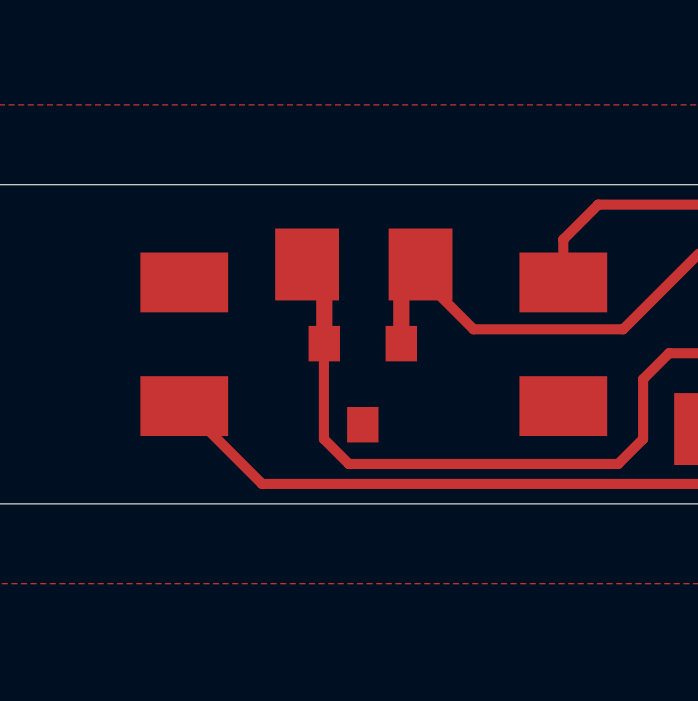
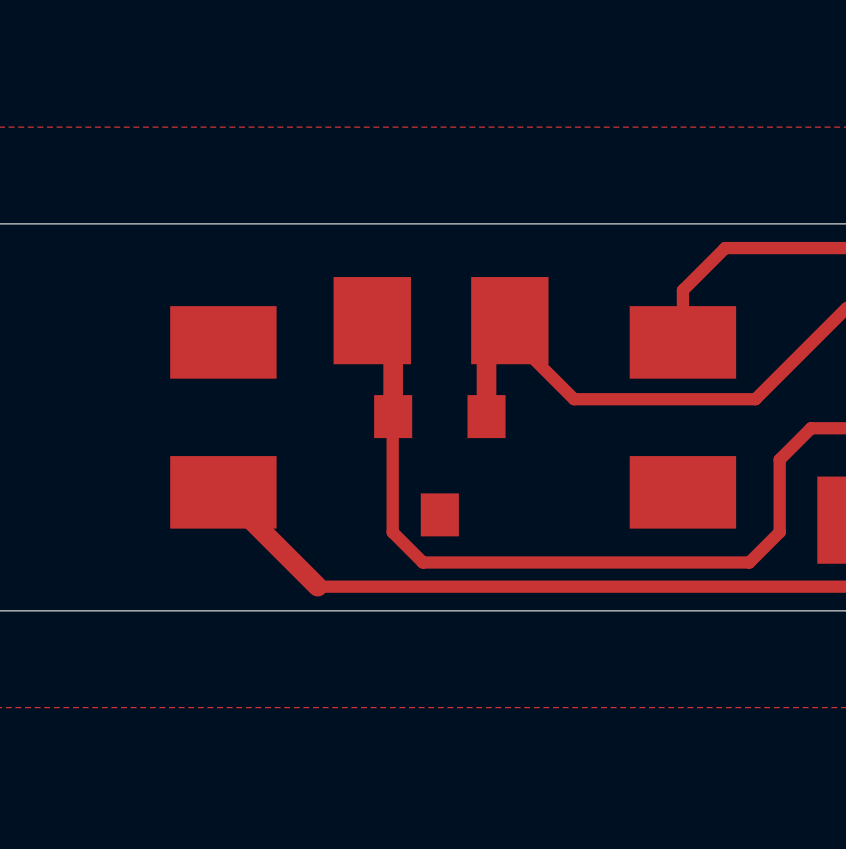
top track width: thin (184, 406) (262, 483) -> thick (223, 492) (317, 586)

